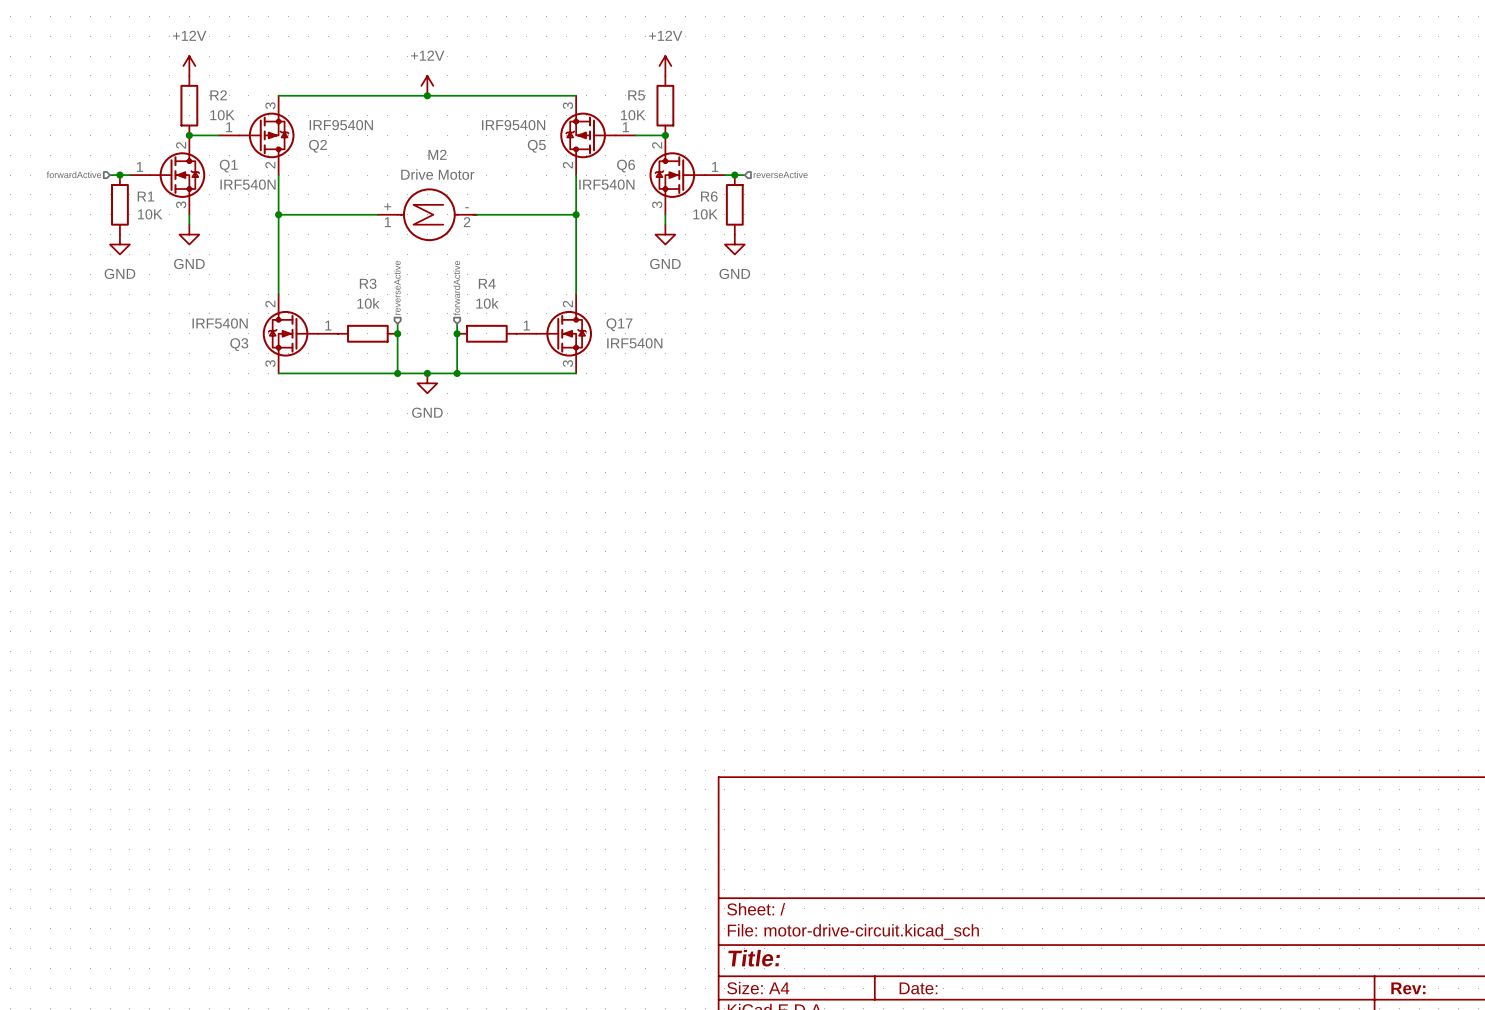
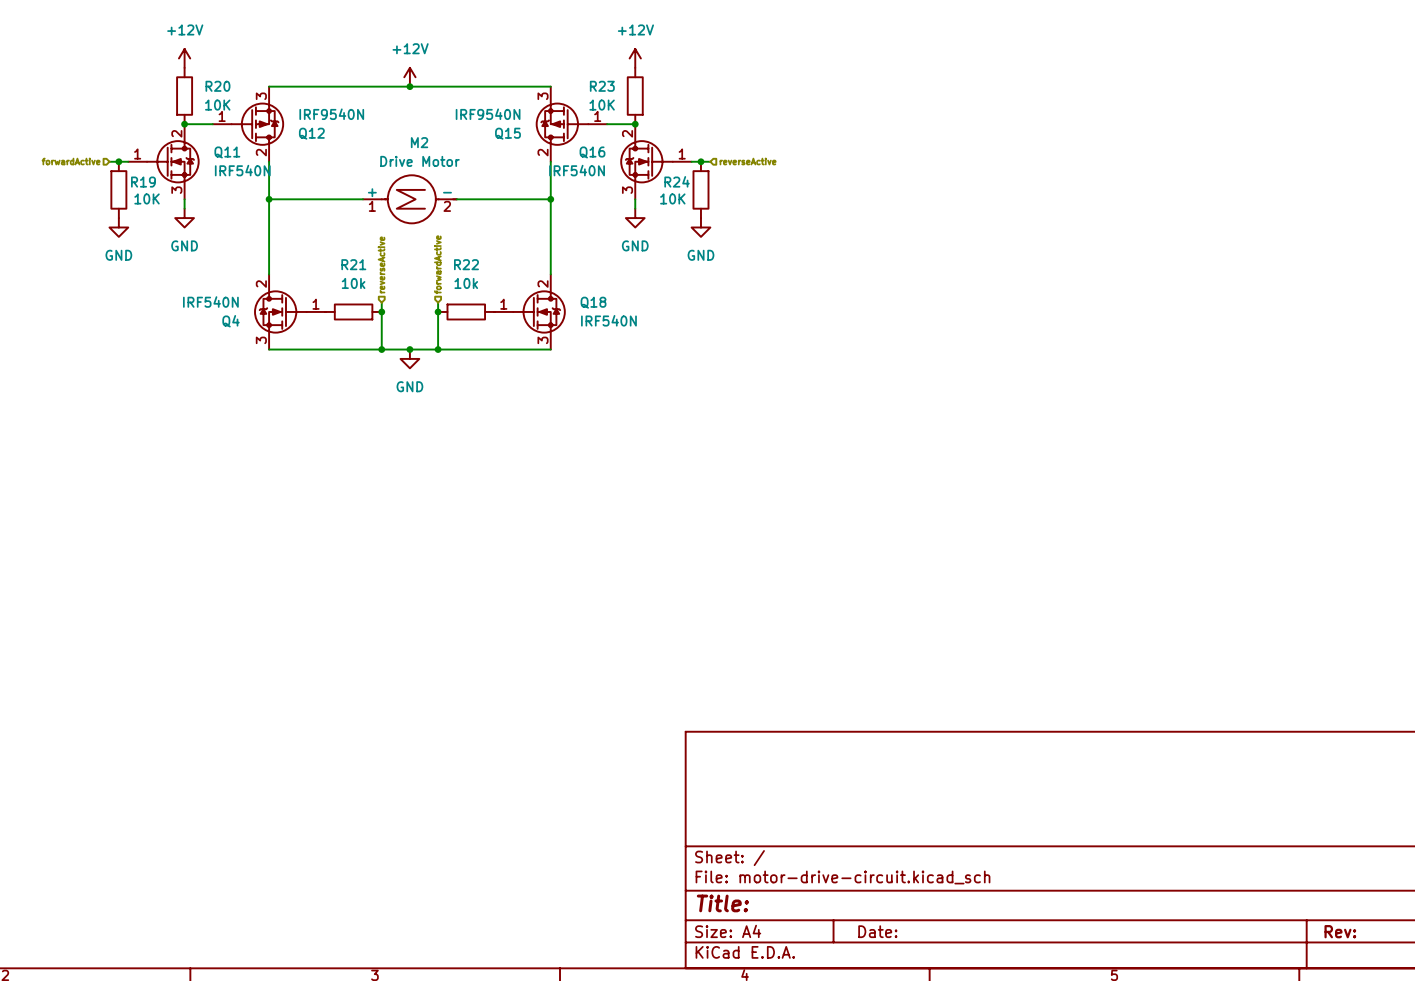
R2 name: R2 (218, 95) -> R20 (217, 86)
R5 name: R5 (636, 95) -> R23 (602, 86)
Q2 name: Q2 (317, 146) -> Q12 (311, 133)
Q5 name: Q5 (536, 146) -> Q15 (507, 133)
Q1 name: Q1 (228, 166) -> Q11 (227, 152)
Q6 name: Q6 (626, 166) -> Q16 (592, 152)
R1 name: R1 (145, 196) -> R19 (143, 182)
R6 name: R6 (709, 196) -> R24 (677, 181)
R3 name: R3 (368, 283) -> R21 (353, 264)
R4 name: R4 (487, 283) -> R22 (466, 264)
Q17 name: Q17 (619, 324) -> Q18 (593, 302)
Q3 name: Q3 (239, 344) -> Q4 (231, 321)

